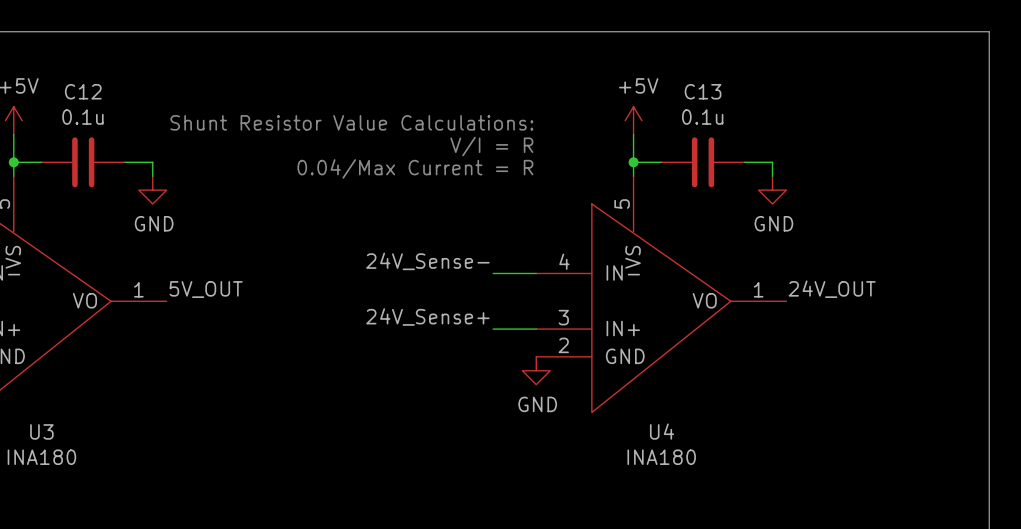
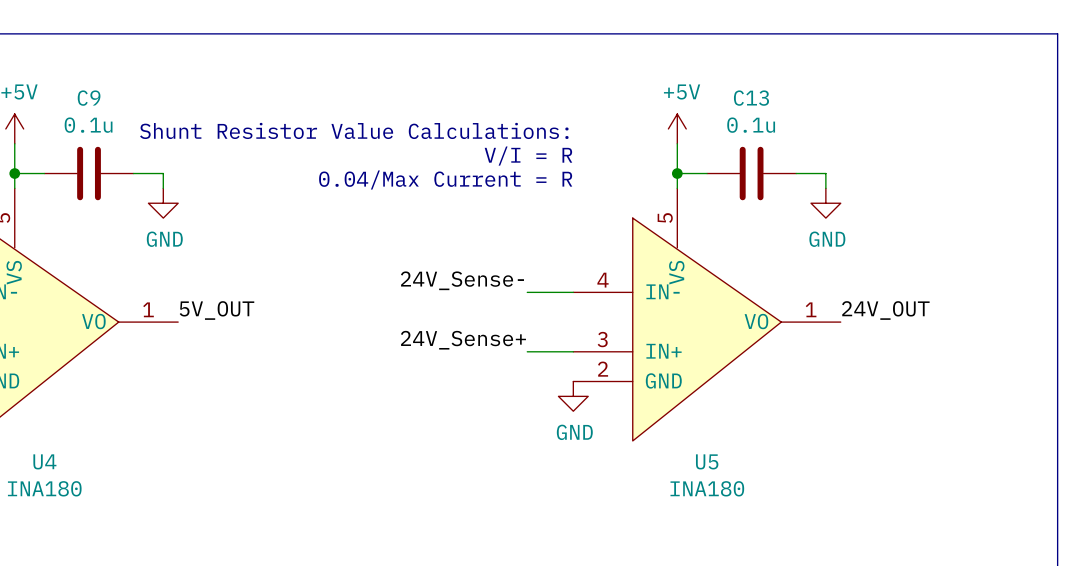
C12 name: C12 (83, 91) -> C9 (89, 98)
U3 name: U3 (41, 431) -> U4 (44, 461)
U4 name: U4 (662, 431) -> U5 (707, 461)

